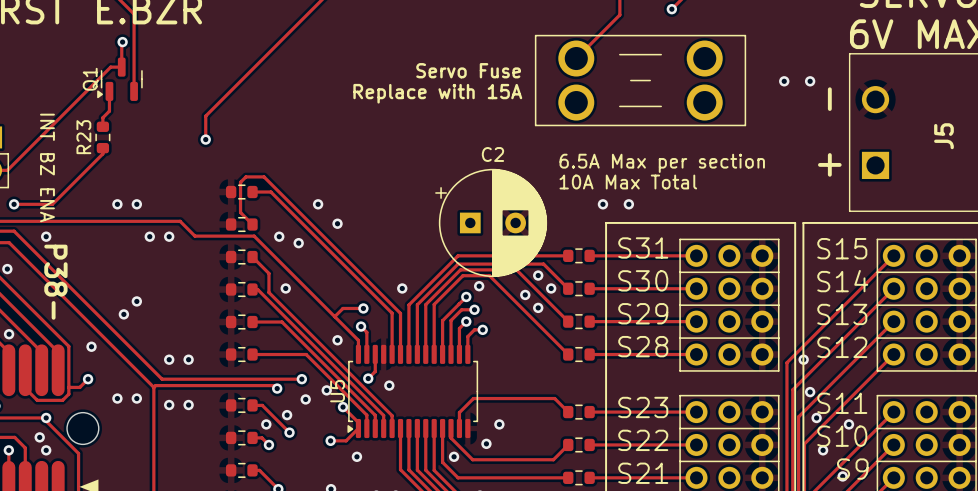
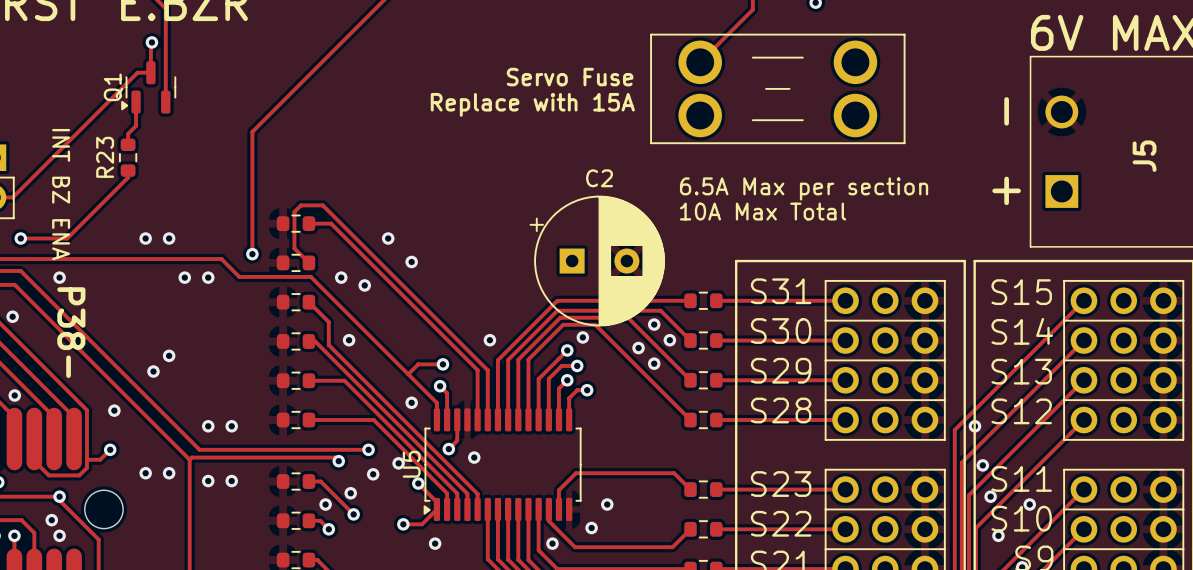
via: (784, 81) -> none
via: (810, 81) -> none
track: none -> (252, 160) (252, 254)
via position: (205, 139) -> (252, 254)
via: (602, 204) -> none
via: (628, 204) -> none

